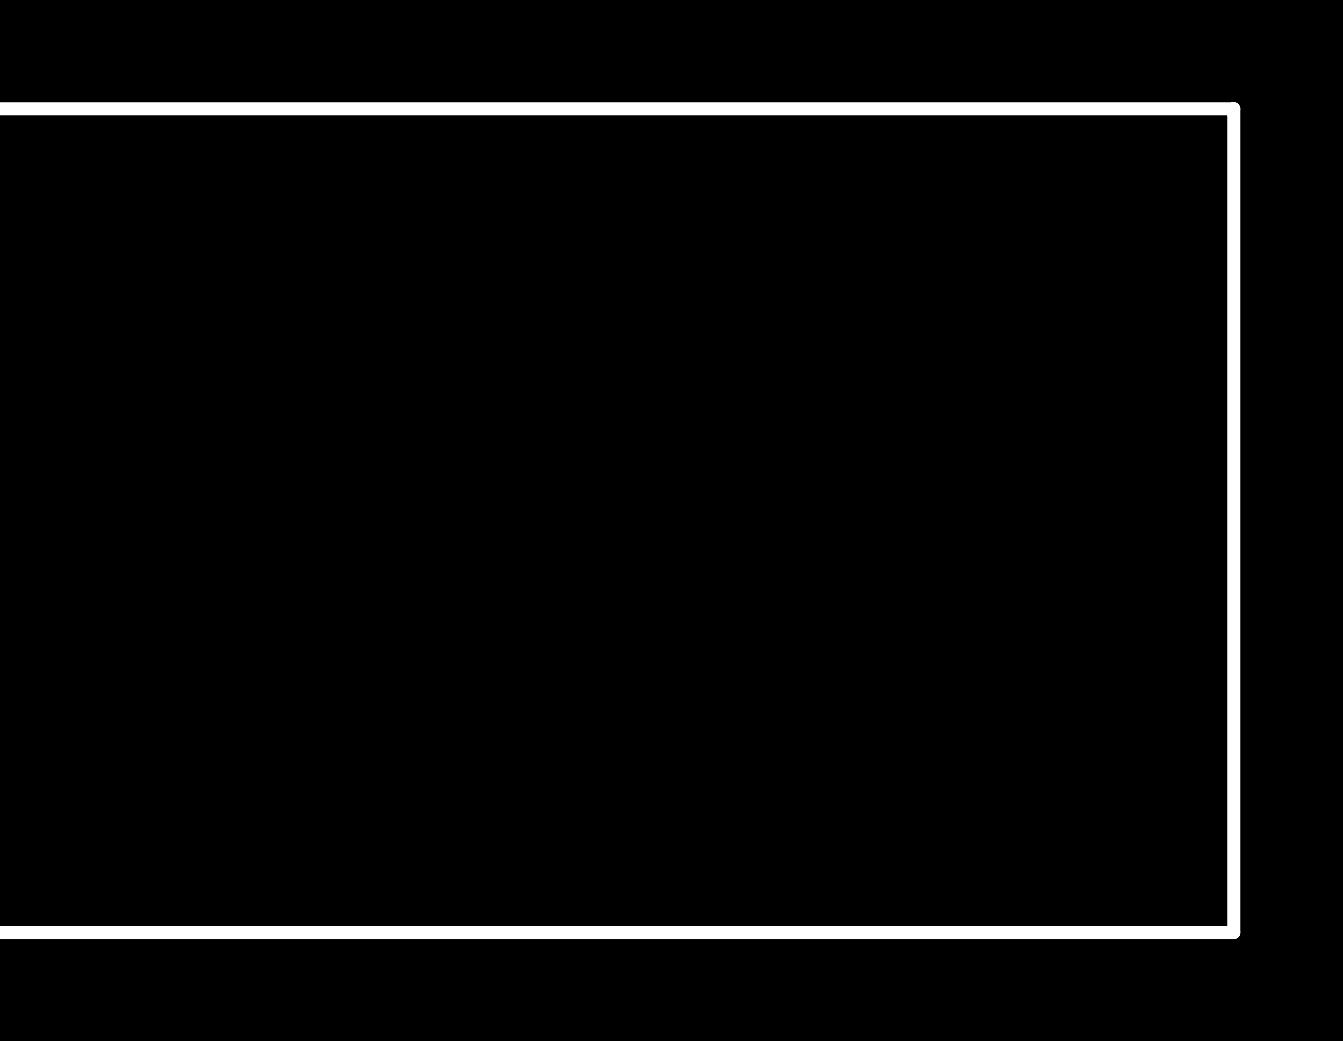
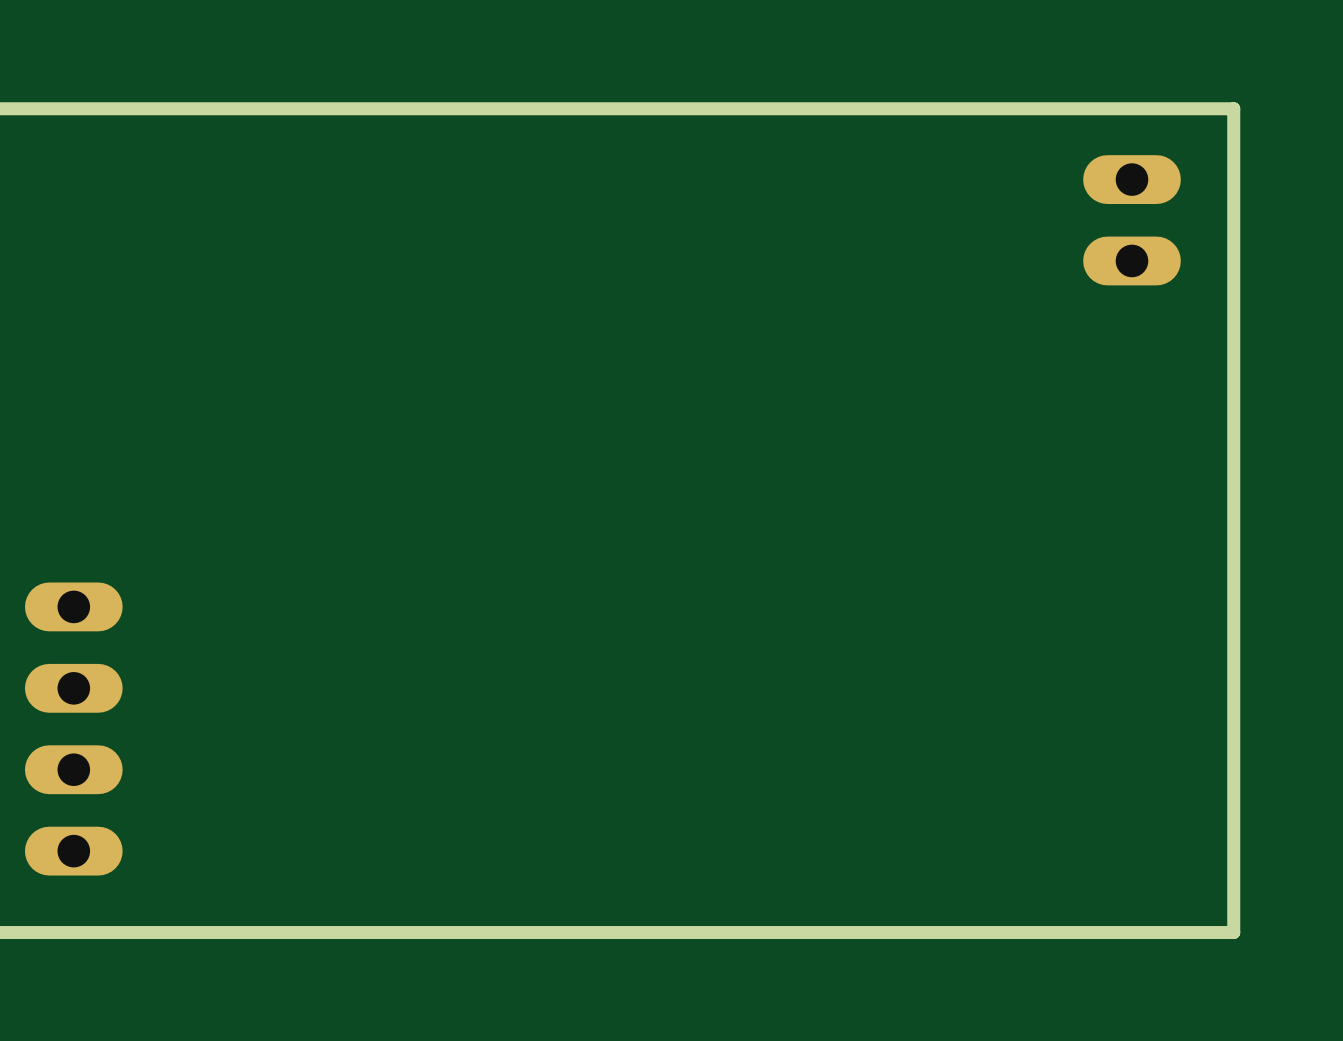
part: none -> (1132, 220)
part: none -> (73, 729)

